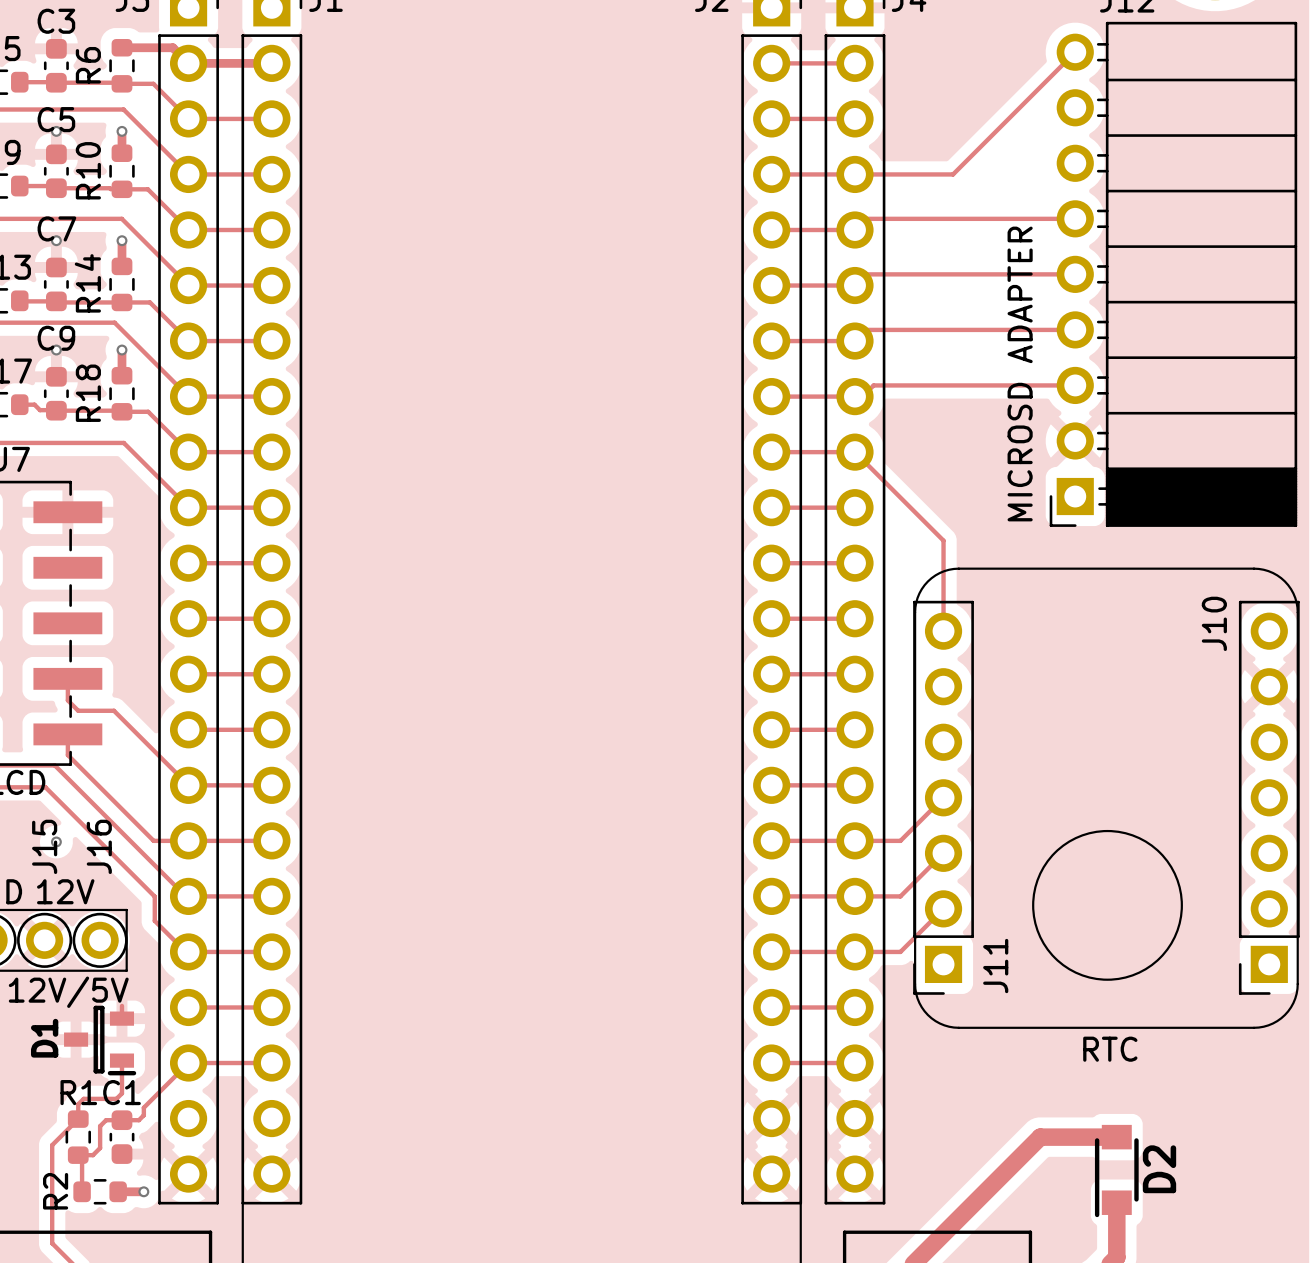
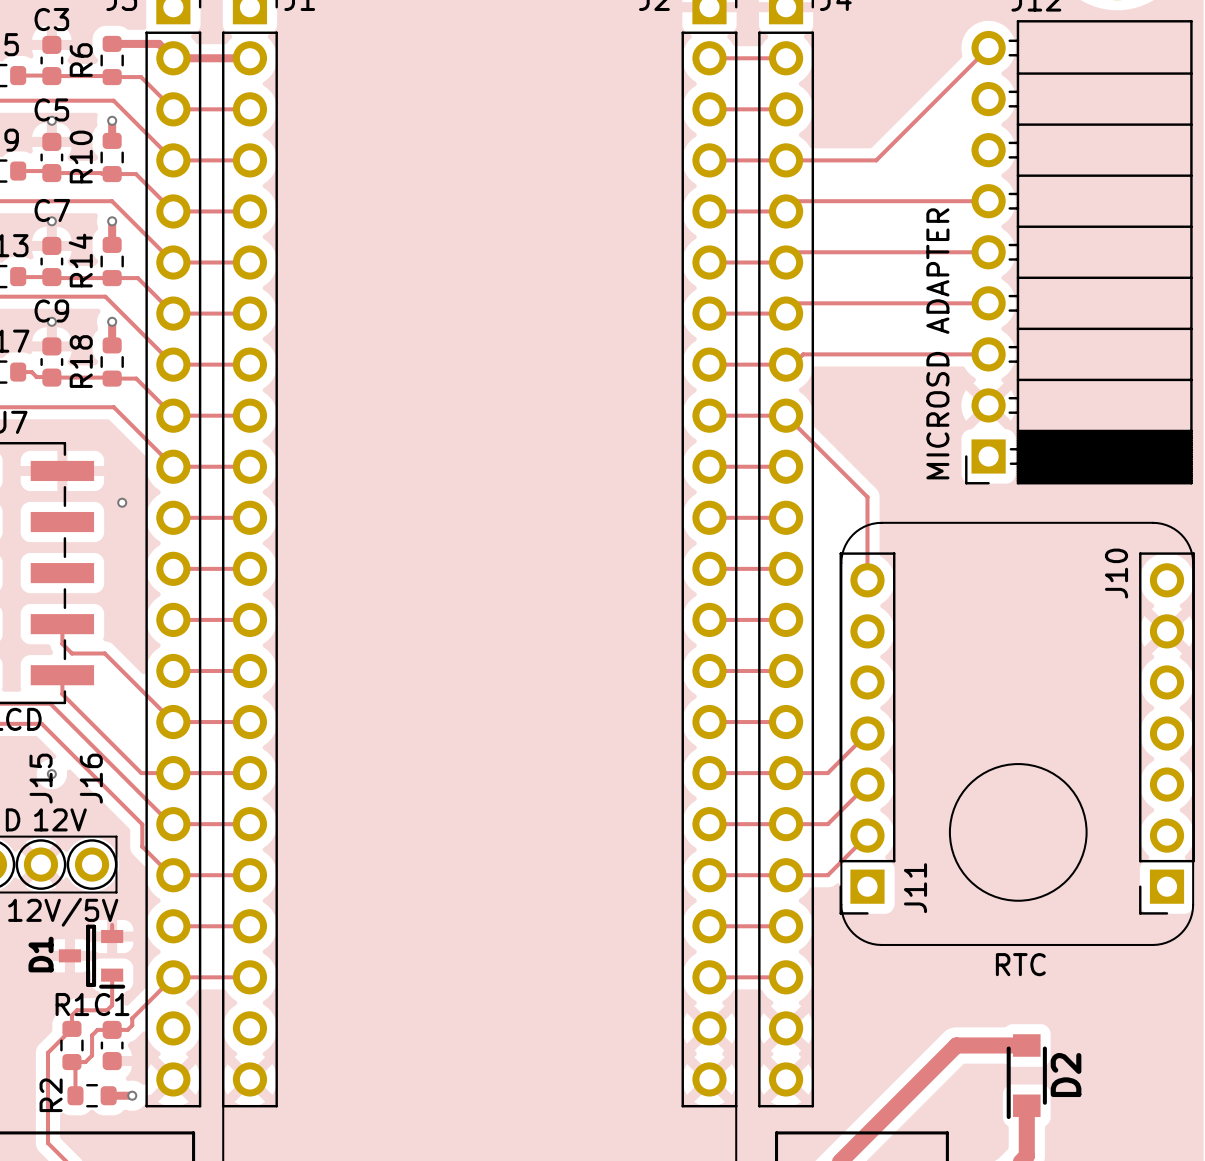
via: none -> (122, 502)

